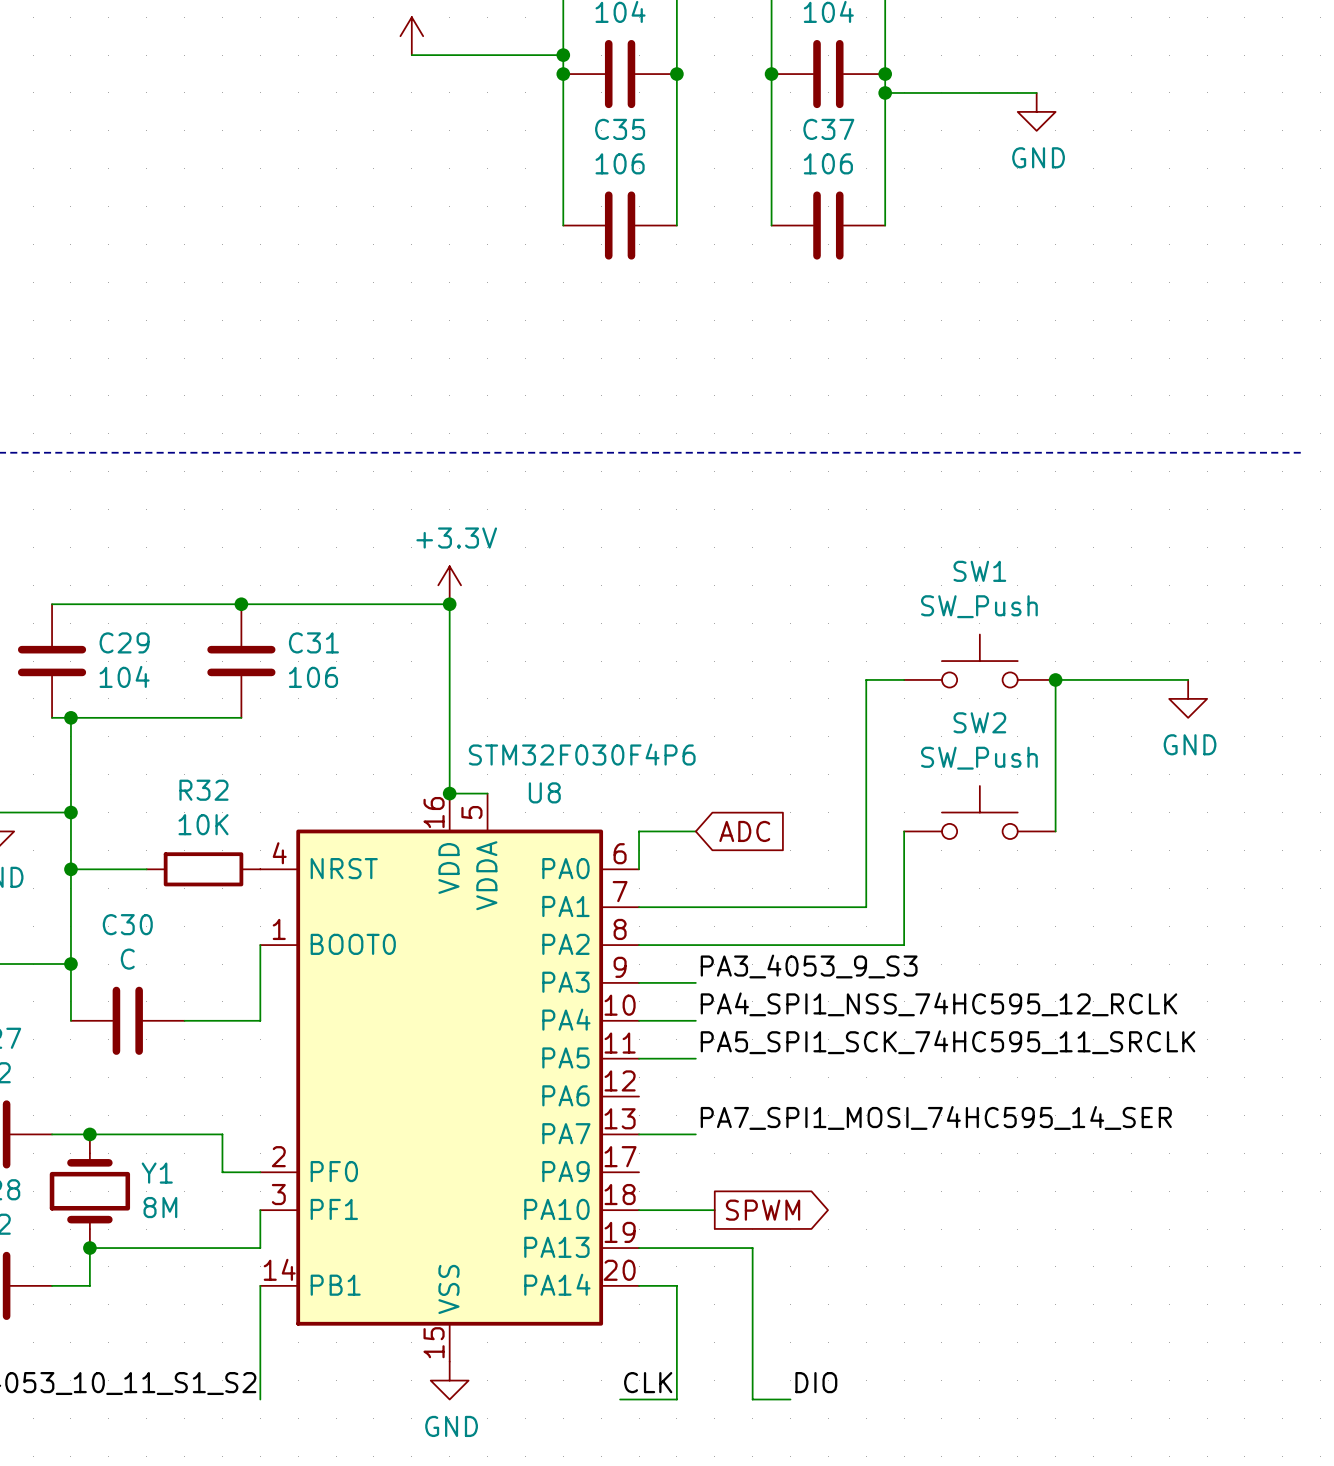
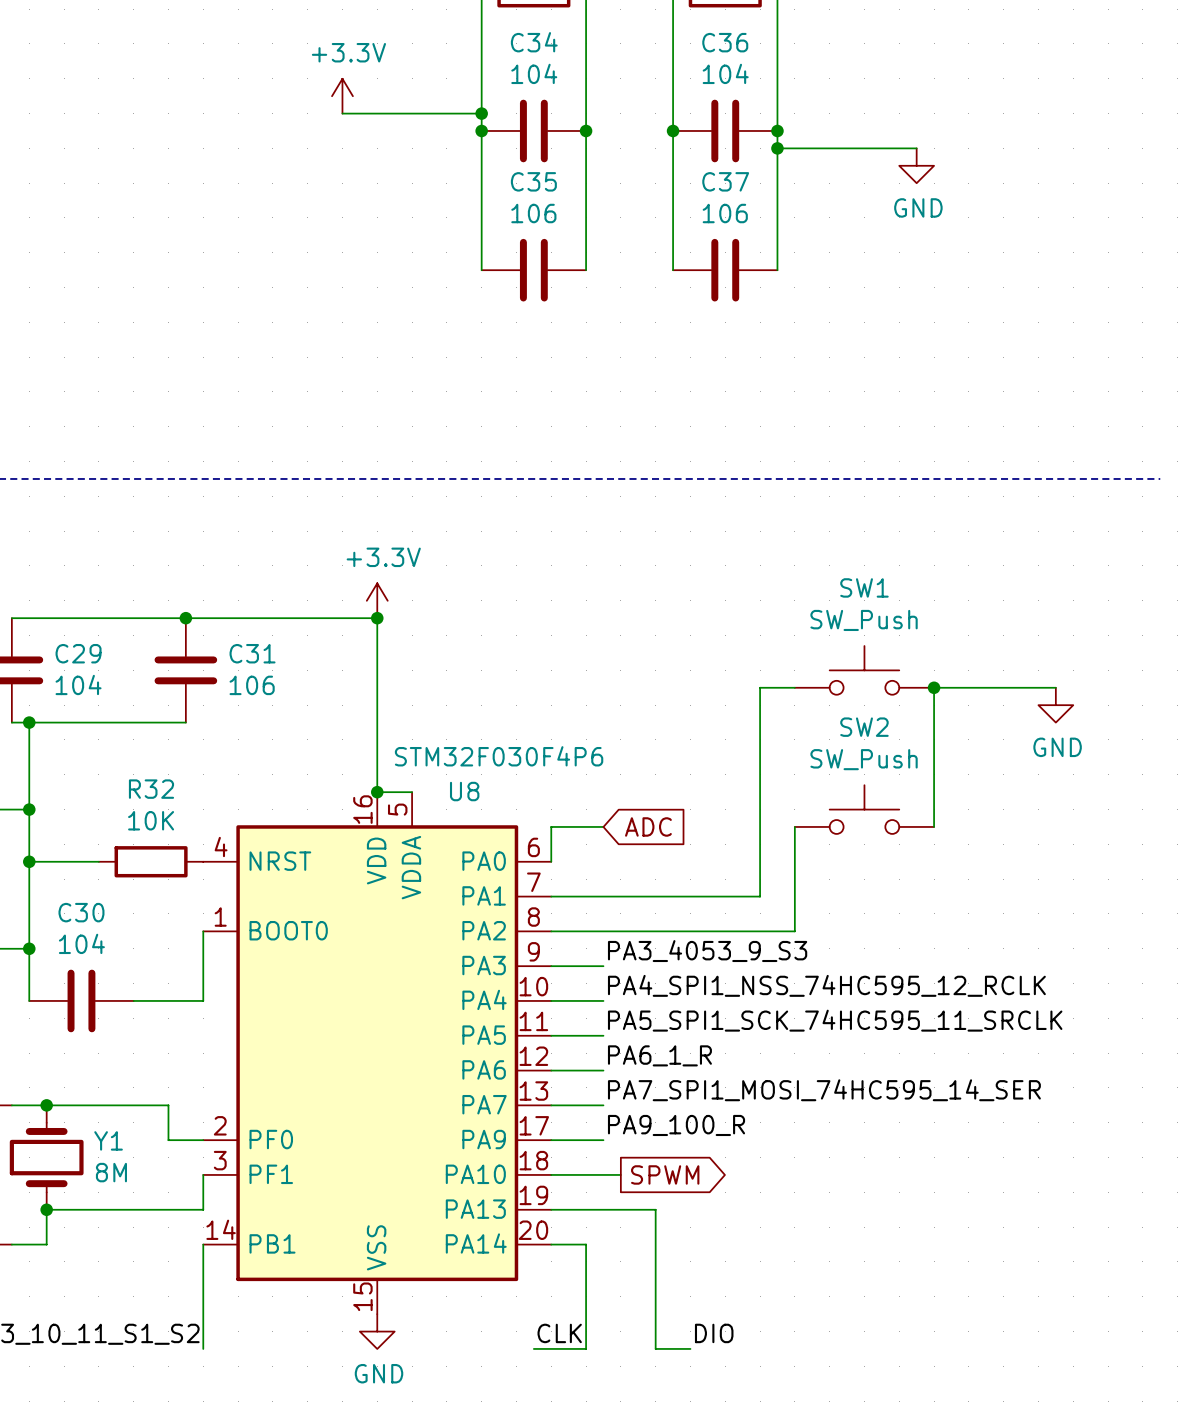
C30 value: C (127, 959) -> 104 (81, 943)
label: none -> PA6_1_R (659, 1055)
wire: none -> (551, 1070) (603, 1070)
label: none -> PA9_100_R (676, 1125)
wire: none -> (551, 1140) (603, 1140)

